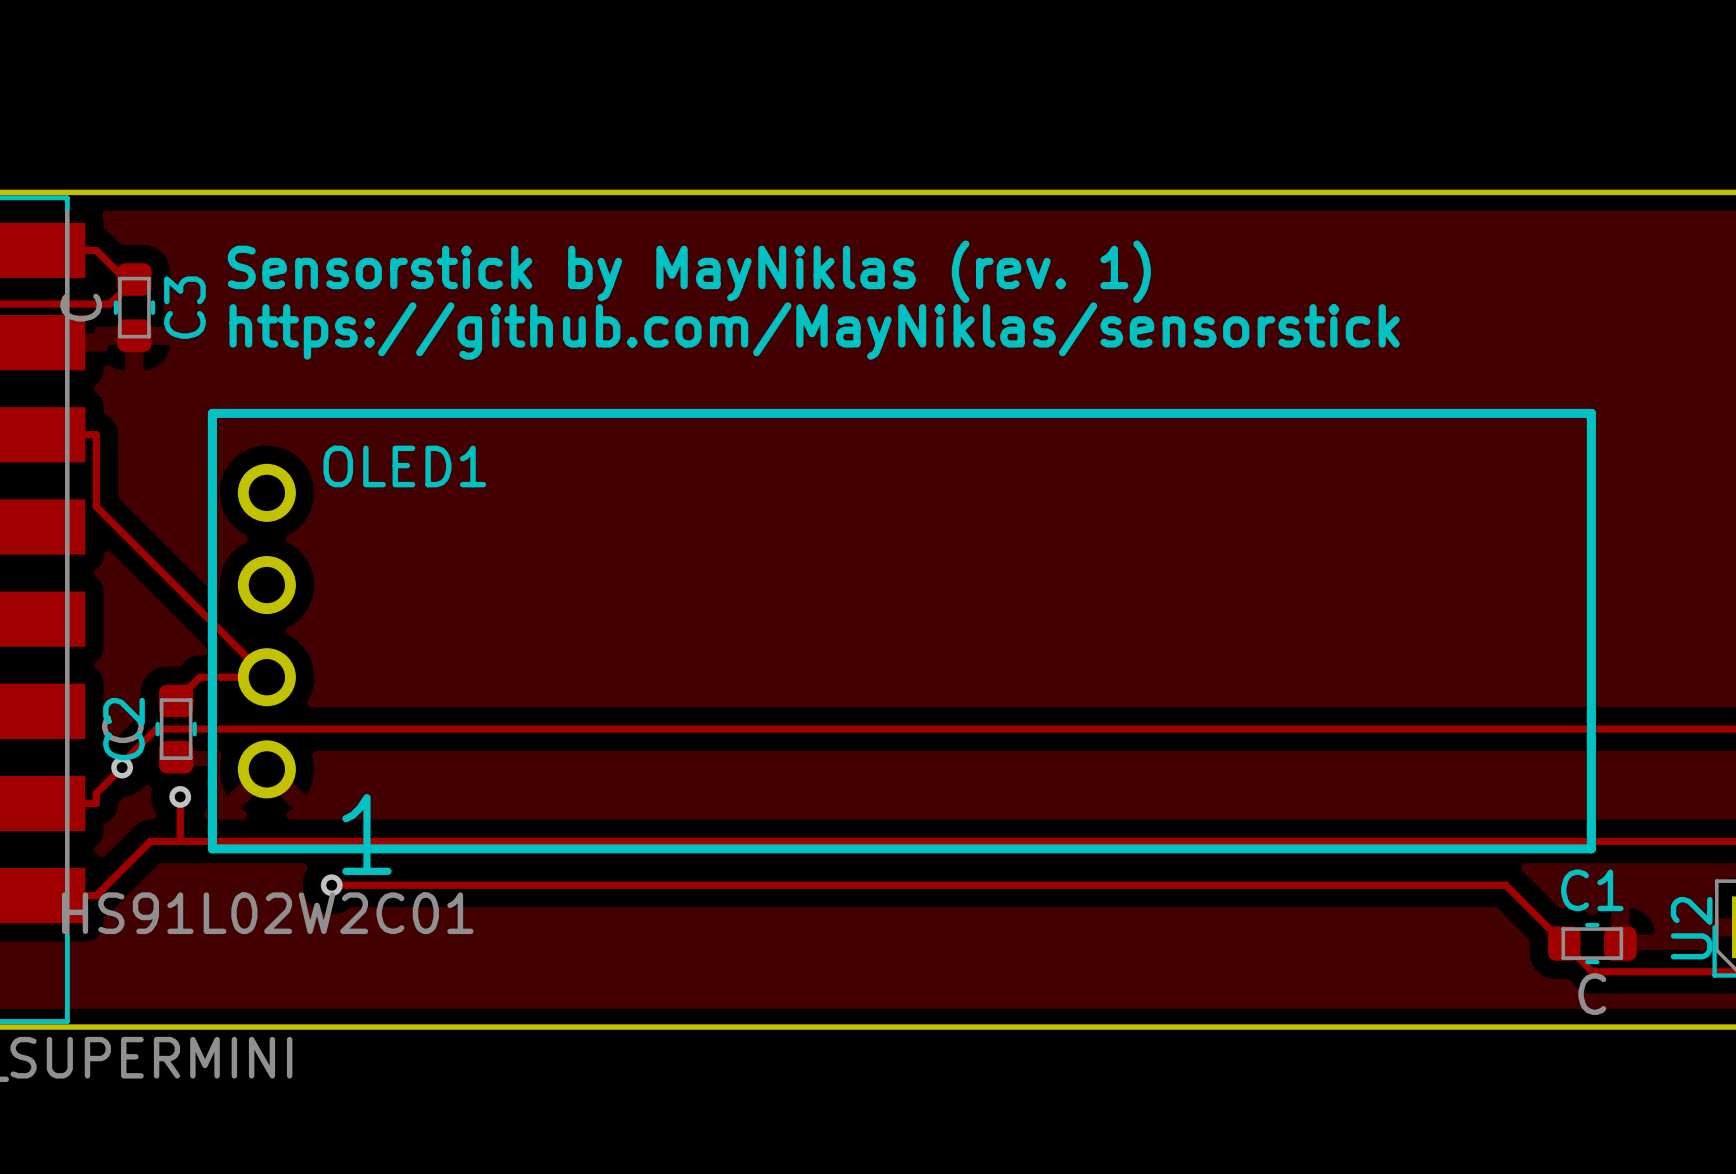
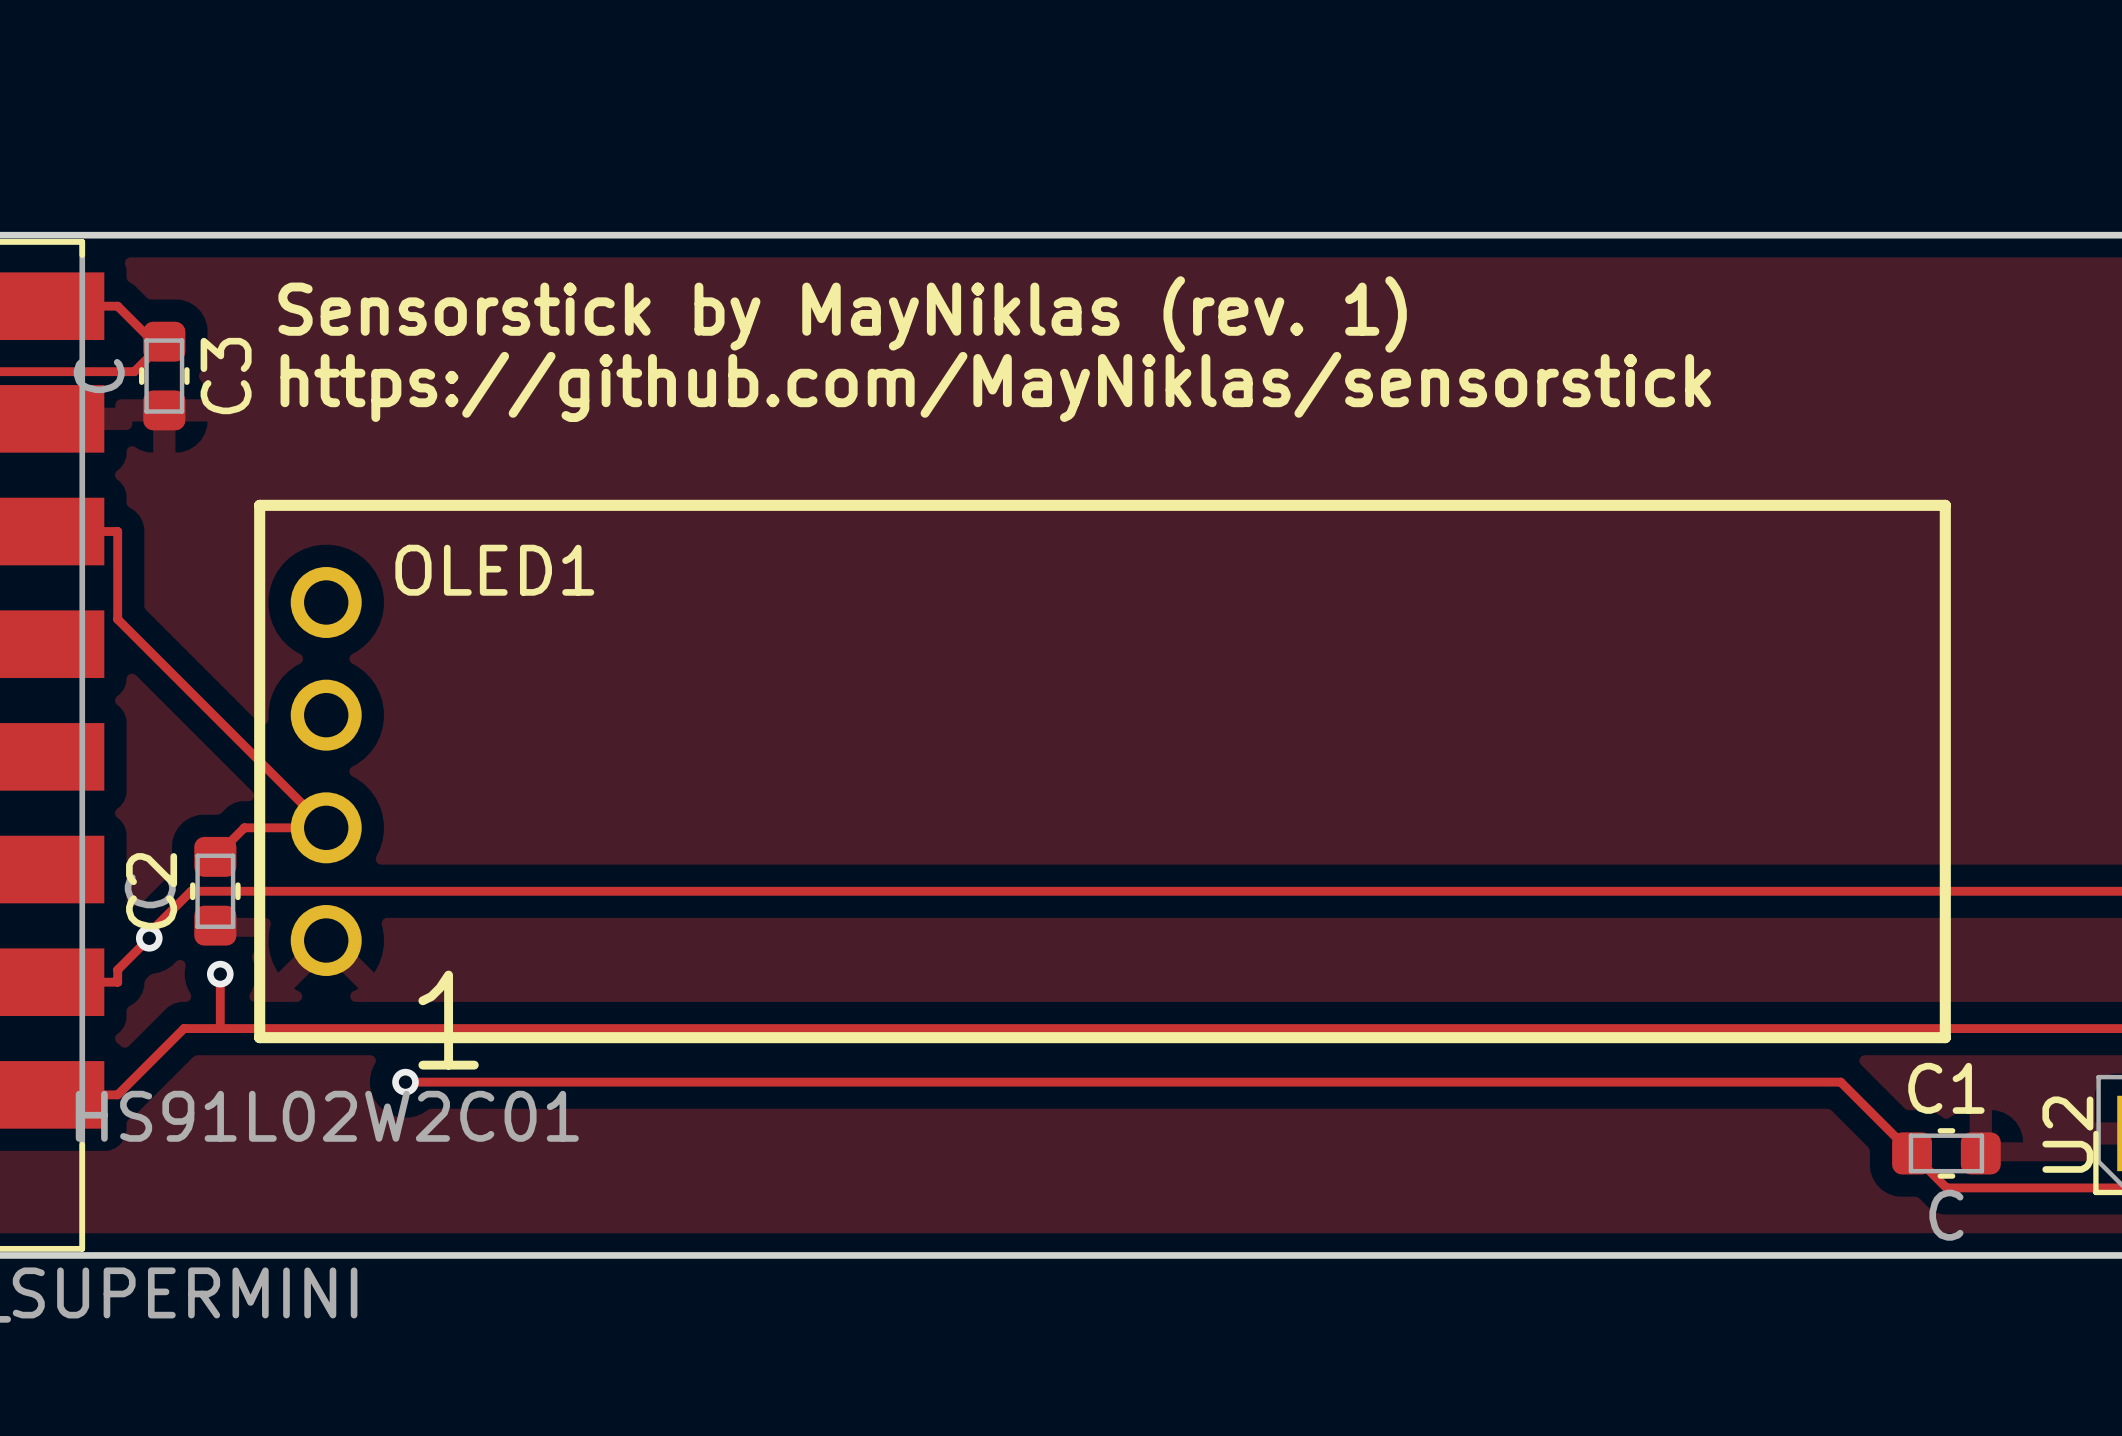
text position: Sensorstick by MayNiklas (rev. 1) (689, 271) -> Sensorstick by MayNiklas (rev. 1) (842, 314)
text position: https://github.com/MayNiklas/sensorstick (814, 331) -> https://github.com/MayNiklas/sensorstick (995, 386)

